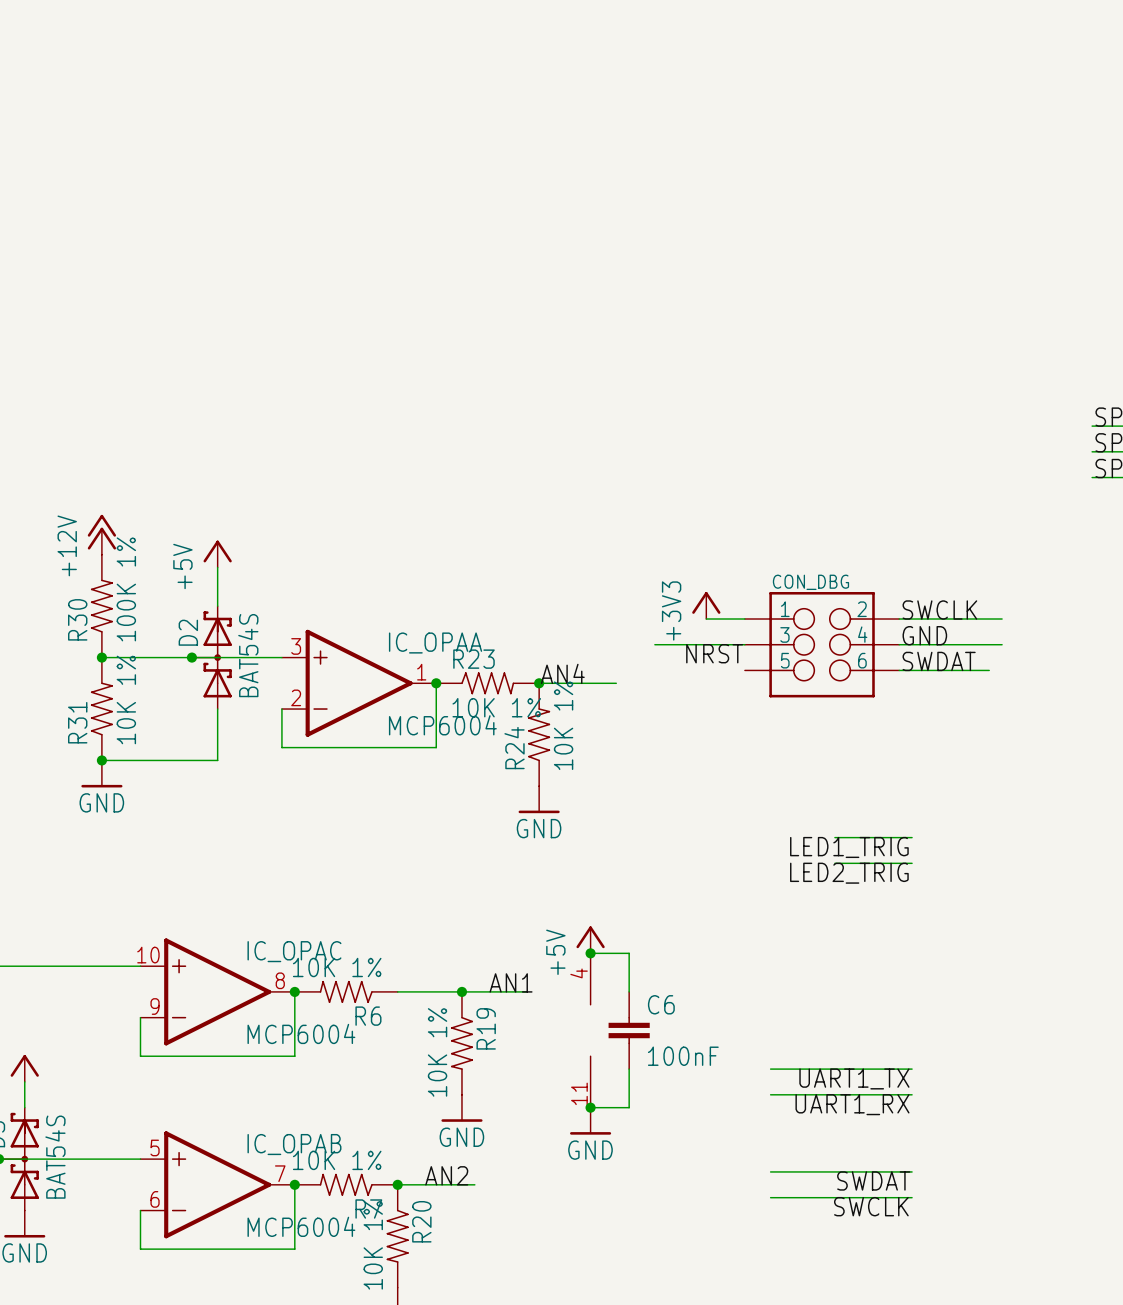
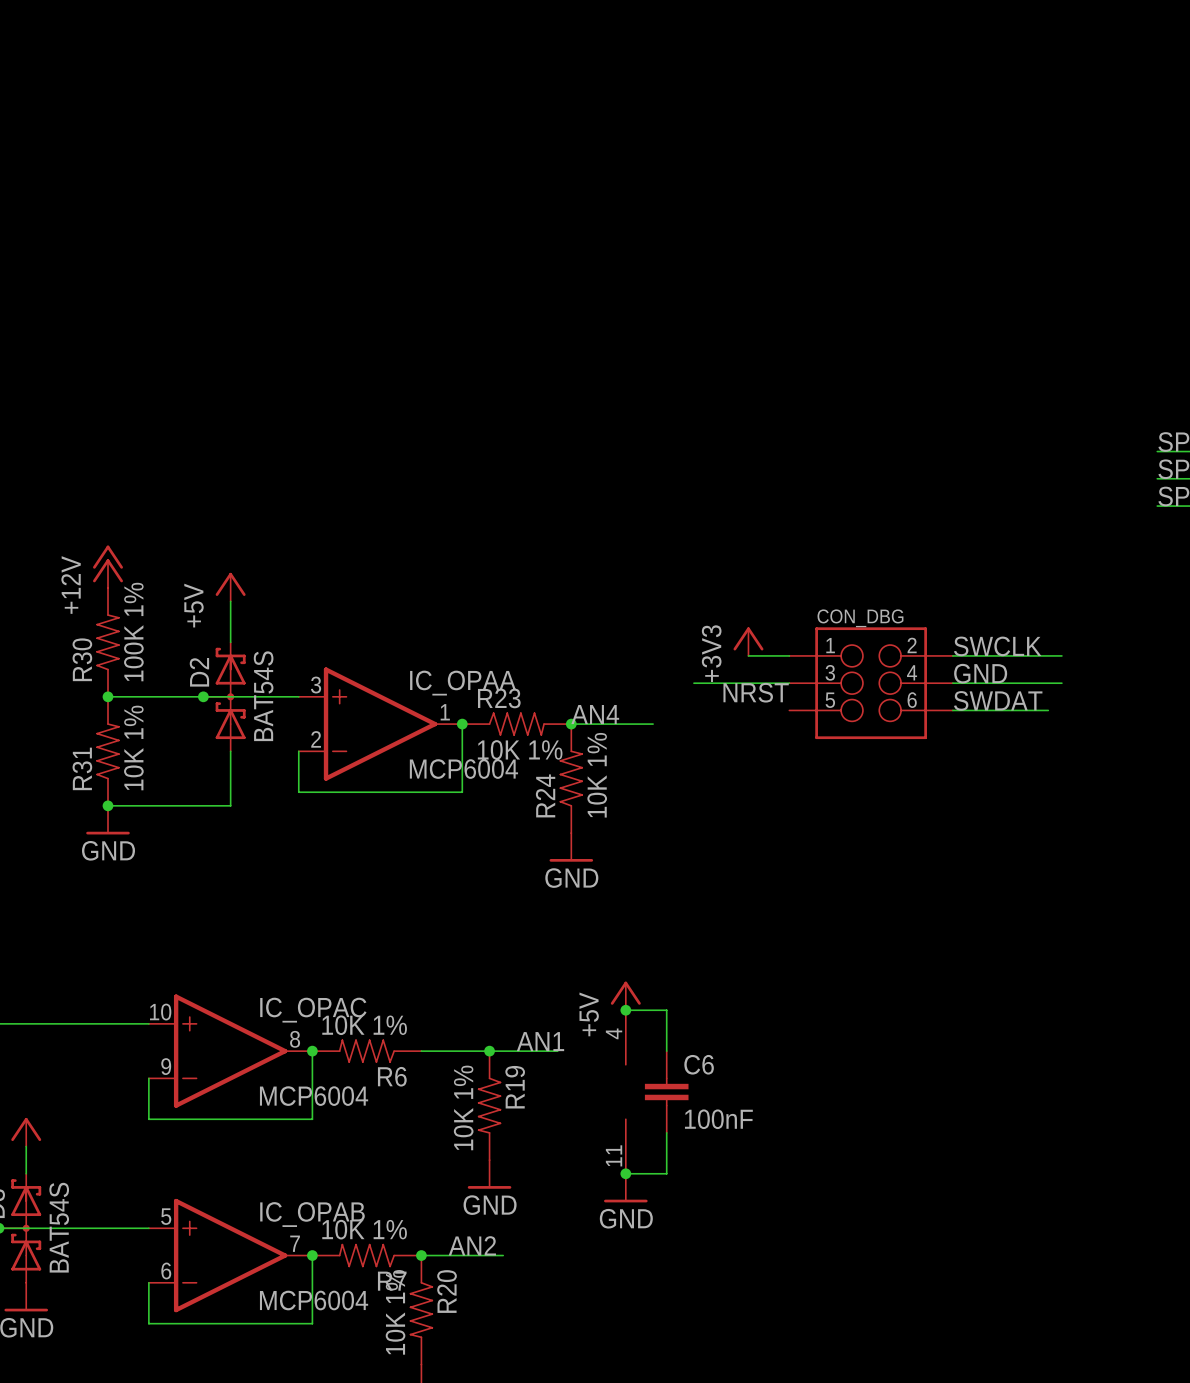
wire: (834, 837) (912, 837) -> none
label: LED1_TRIG (849, 847) -> none
wire: (834, 863) (912, 863) -> none
label: LED2_TRIG (849, 873) -> none
wire: (770, 1069) (912, 1069) -> none
label: UART1_TX (854, 1078) -> none
wire: (770, 1094) (912, 1094) -> none
label: UART1_RX (852, 1104) -> none
wire: (770, 1171) (912, 1171) -> none
label: SWDAT (873, 1180) -> none
wire: (770, 1197) (912, 1197) -> none
label: SWCLK (871, 1206) -> none

